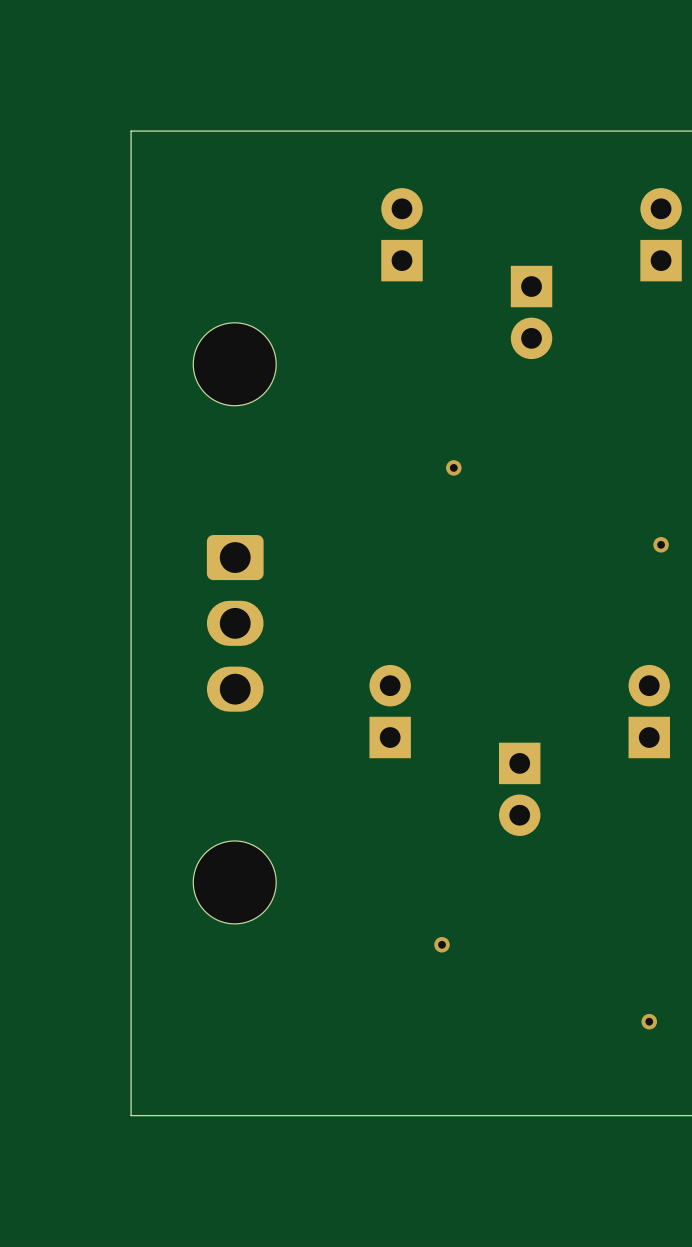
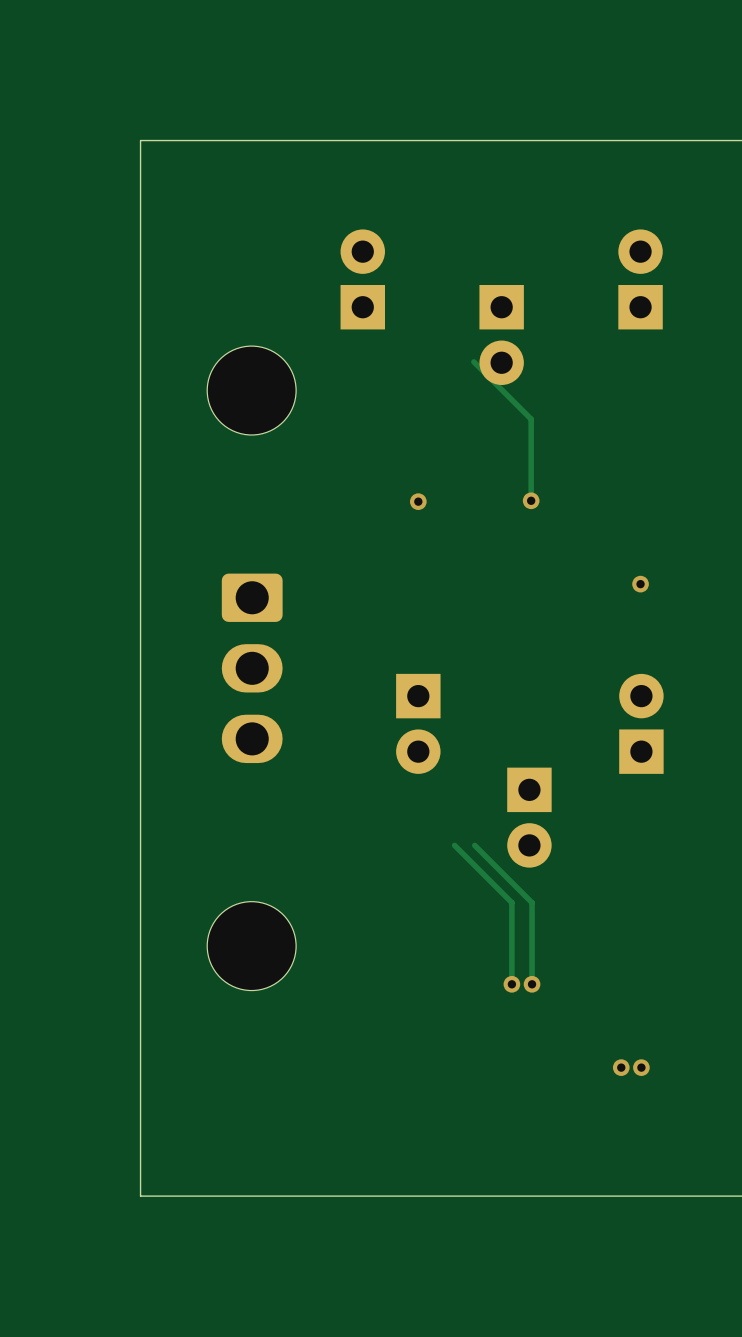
part: (401, 234) -> none
part: (661, 234) -> none
part: none -> (362, 279)
part: none -> (640, 279)
part: none -> (501, 334)
part: (531, 312) -> none
track: none -> (473, 361) (531, 419) (531, 500)
via: none -> (418, 501)
via: (453, 467) -> none
via: none -> (531, 500)
via position: (661, 544) -> (640, 584)
part rotation: 0° (390, 711) -> 180° (418, 723)
part position: (649, 711) -> (641, 723)
track: none -> (454, 845) (511, 902) (511, 984)
track: none -> (474, 845) (532, 902) (532, 984)
part position: (519, 789) -> (529, 817)
via: none -> (511, 984)
via: none -> (532, 984)
via: (441, 944) -> none
via: none -> (621, 1067)
via: none -> (641, 1067)
via: (649, 1021) -> none

